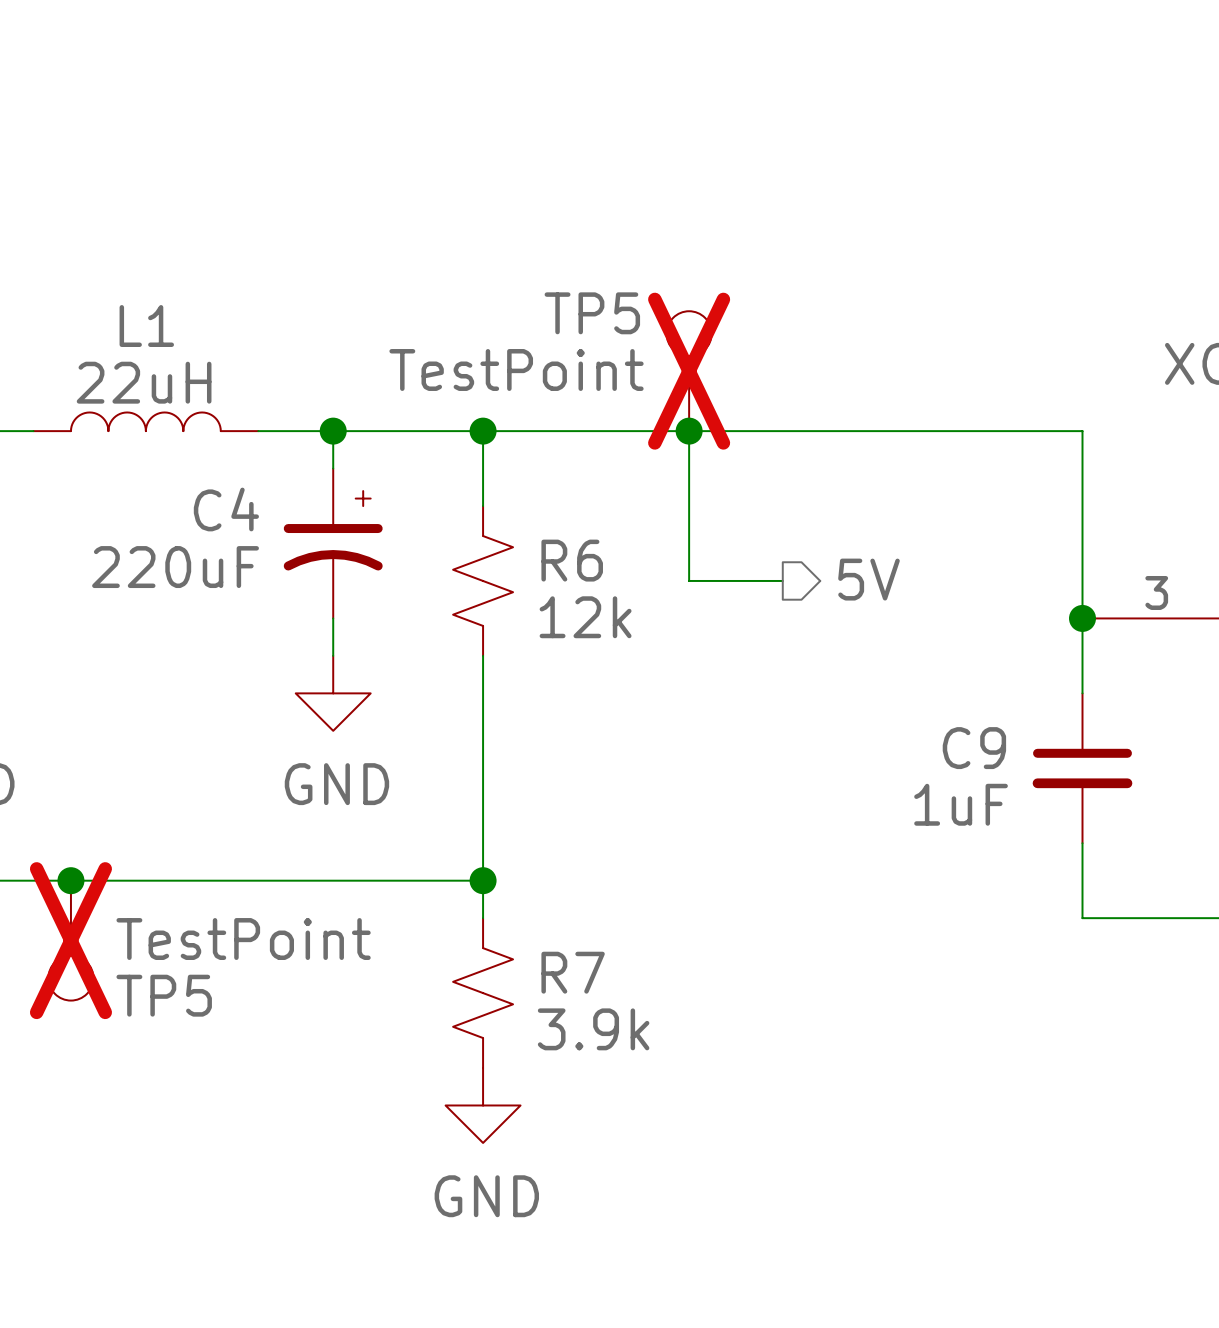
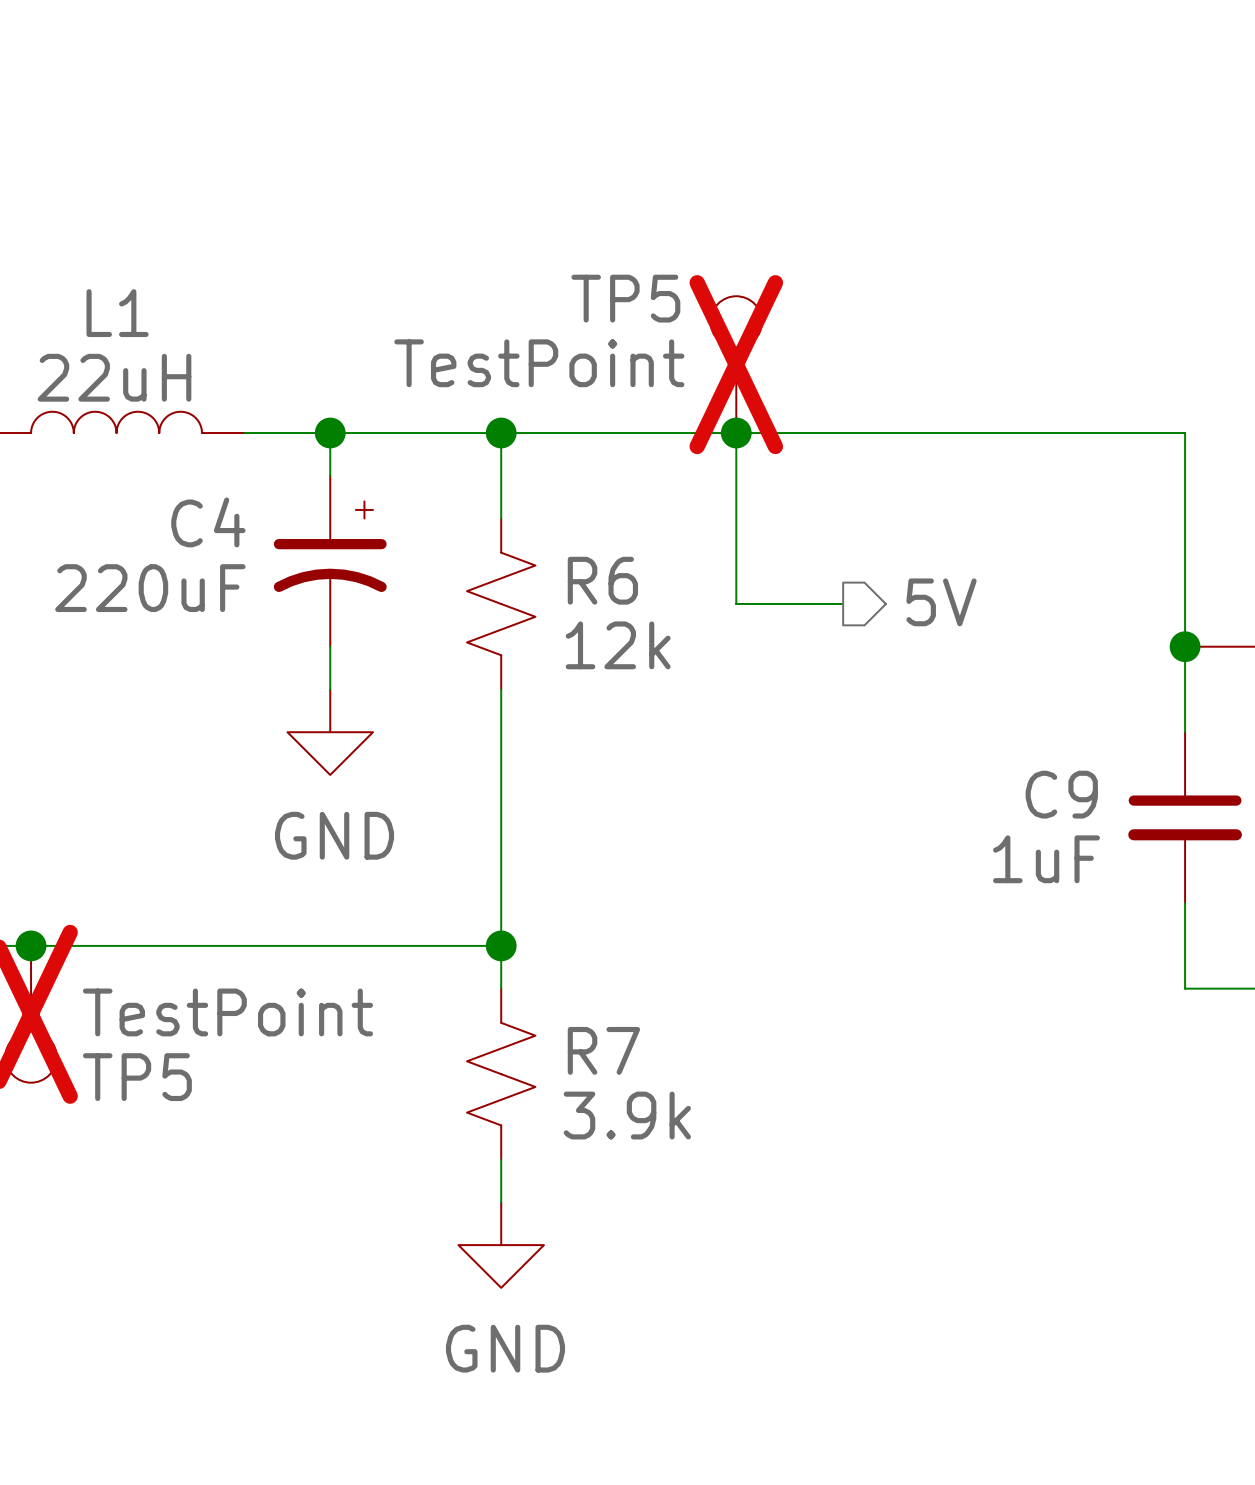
power symbol position: GND (483, 1105) -> GND (501, 1245)

